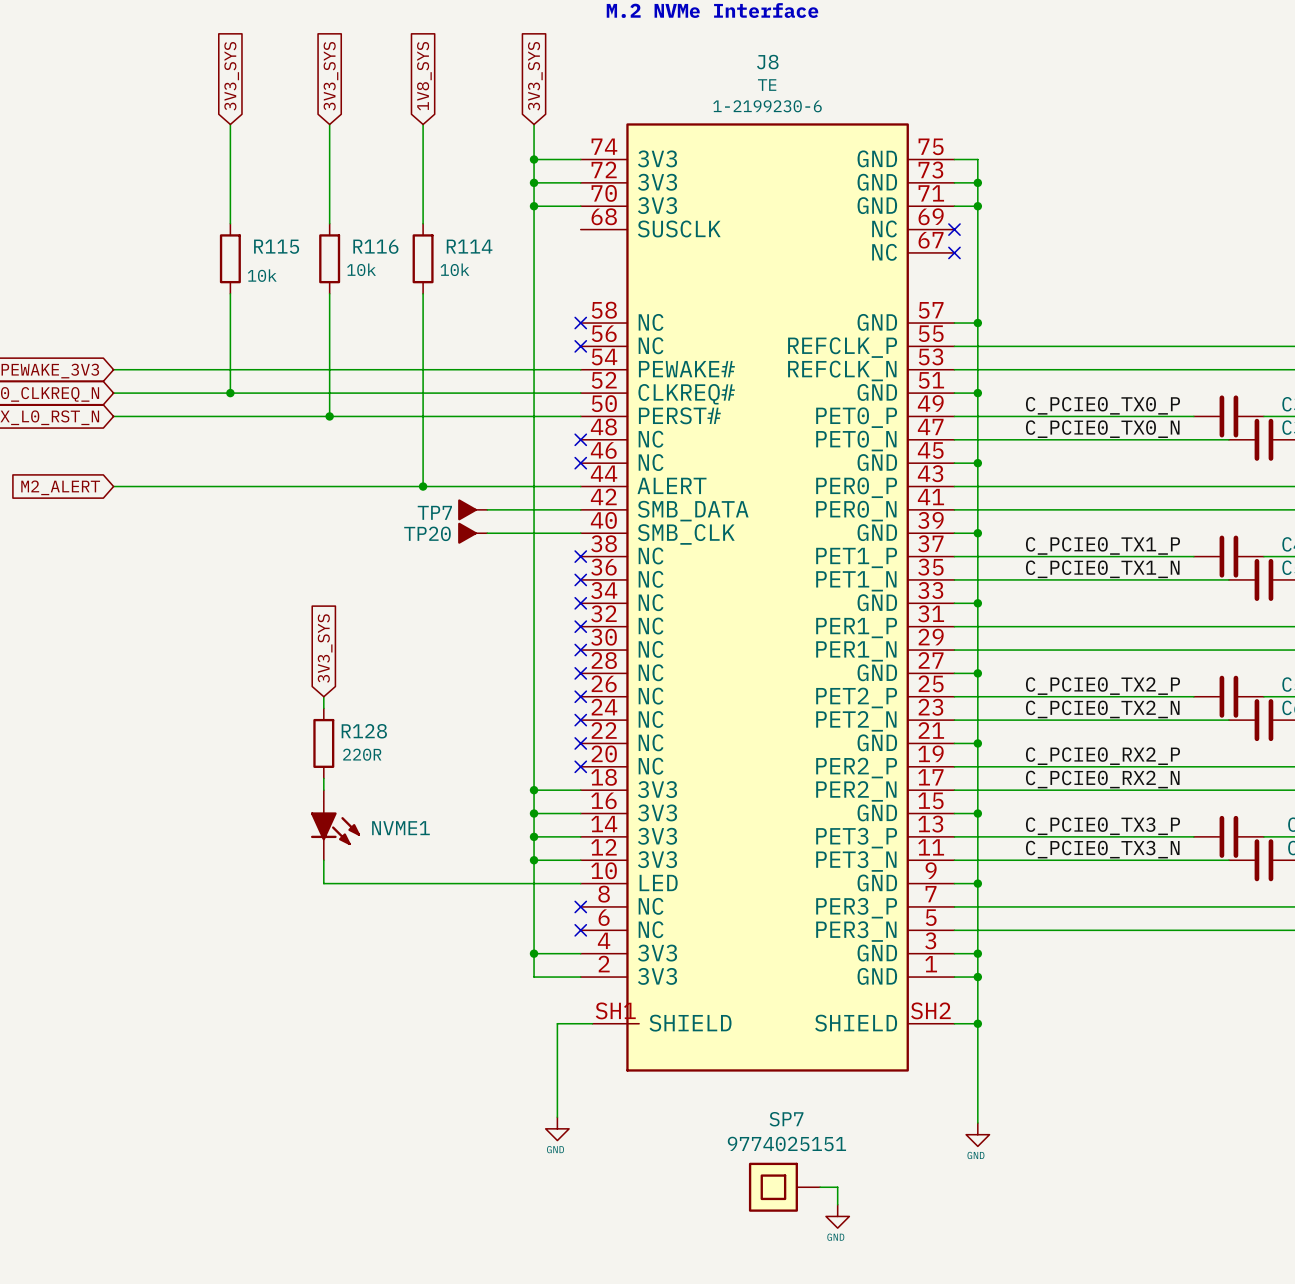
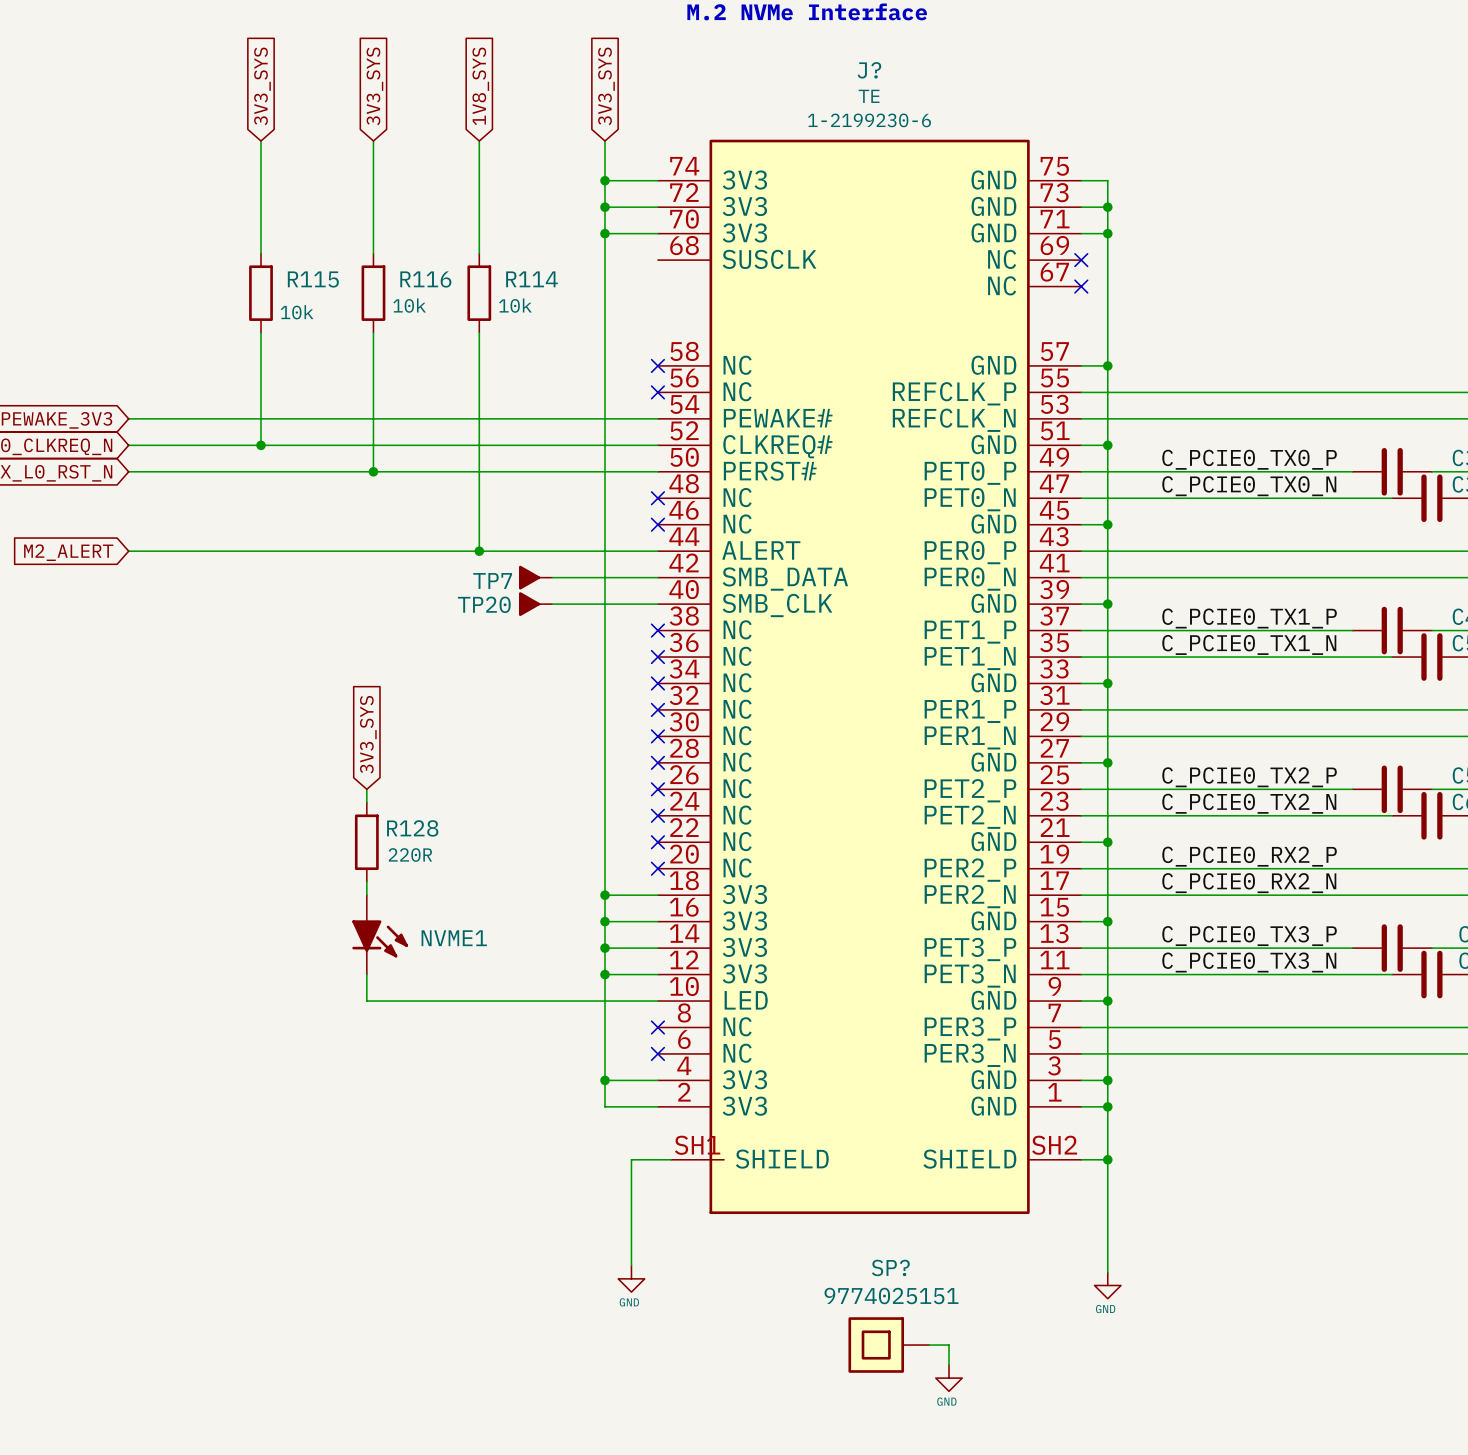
J8 name: J8 (767, 62) -> J? (869, 70)
SP7 name: SP7 (786, 1119) -> SP? (890, 1267)

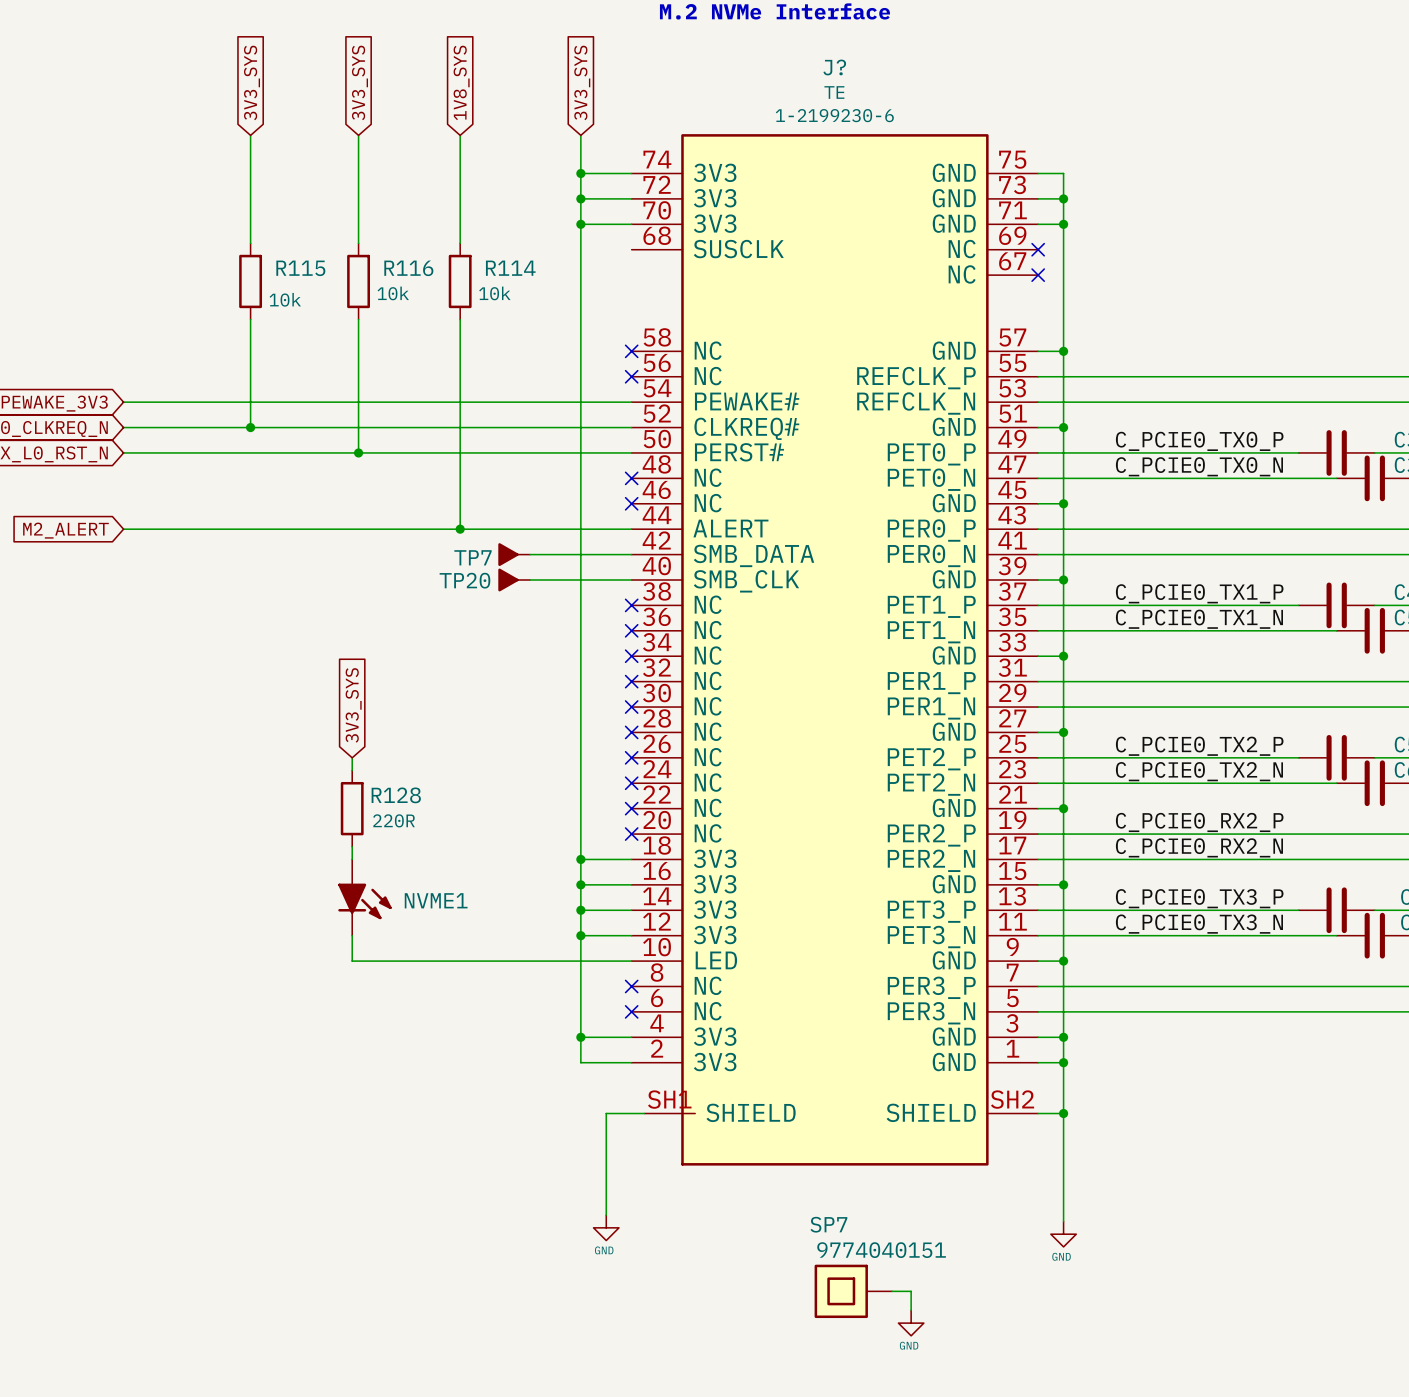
SP? name: SP? (890, 1267) -> SP7 (828, 1224)
SP? value: 9774025151 (891, 1296) -> 9774040151 (881, 1250)

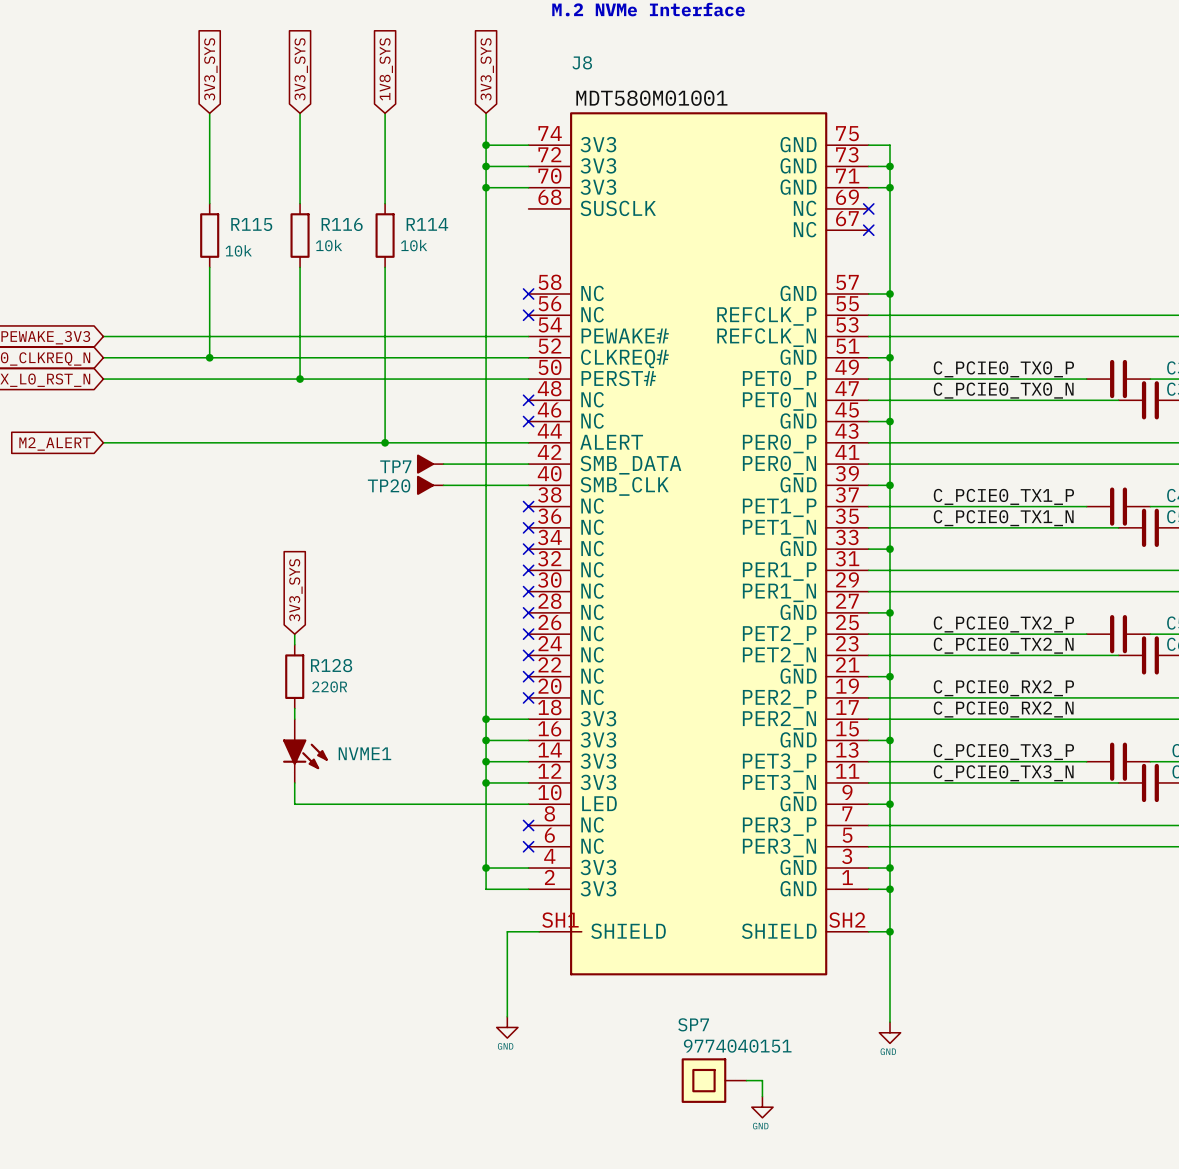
J? name: J? (834, 67) -> J8 (582, 62)
J? text: TE (834, 92) -> none
J? text: 1-2199230-6 (834, 115) -> none
label: none -> MDT580M01001 (651, 98)

